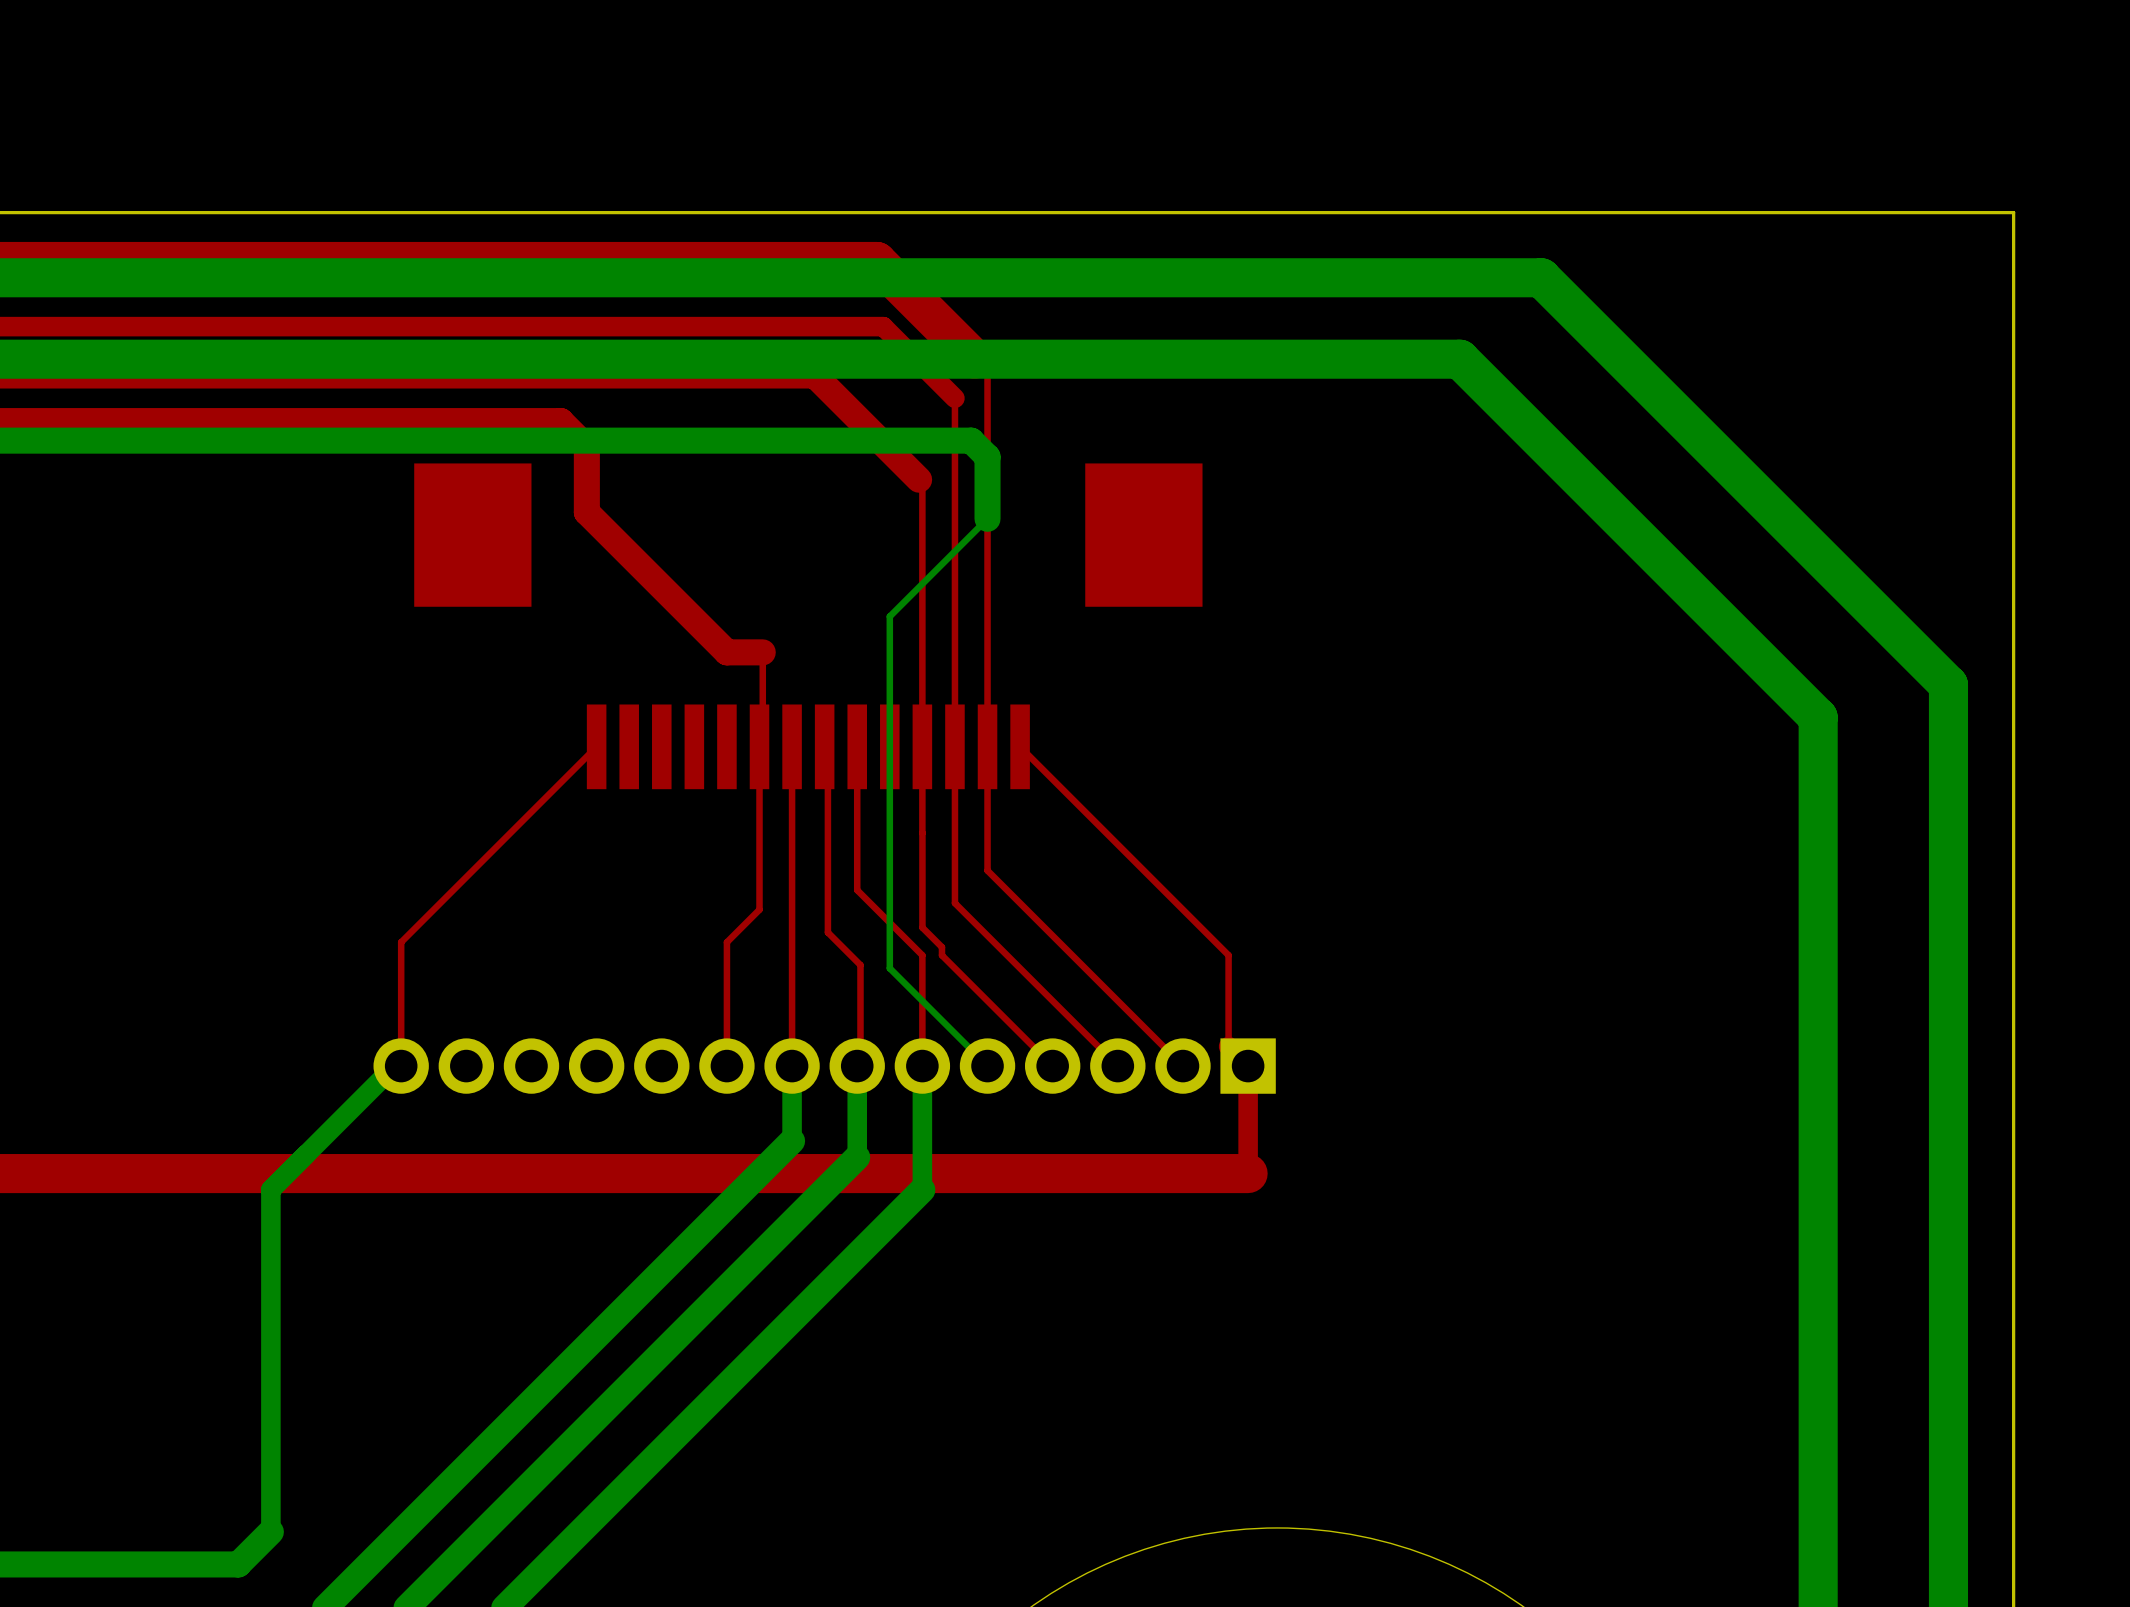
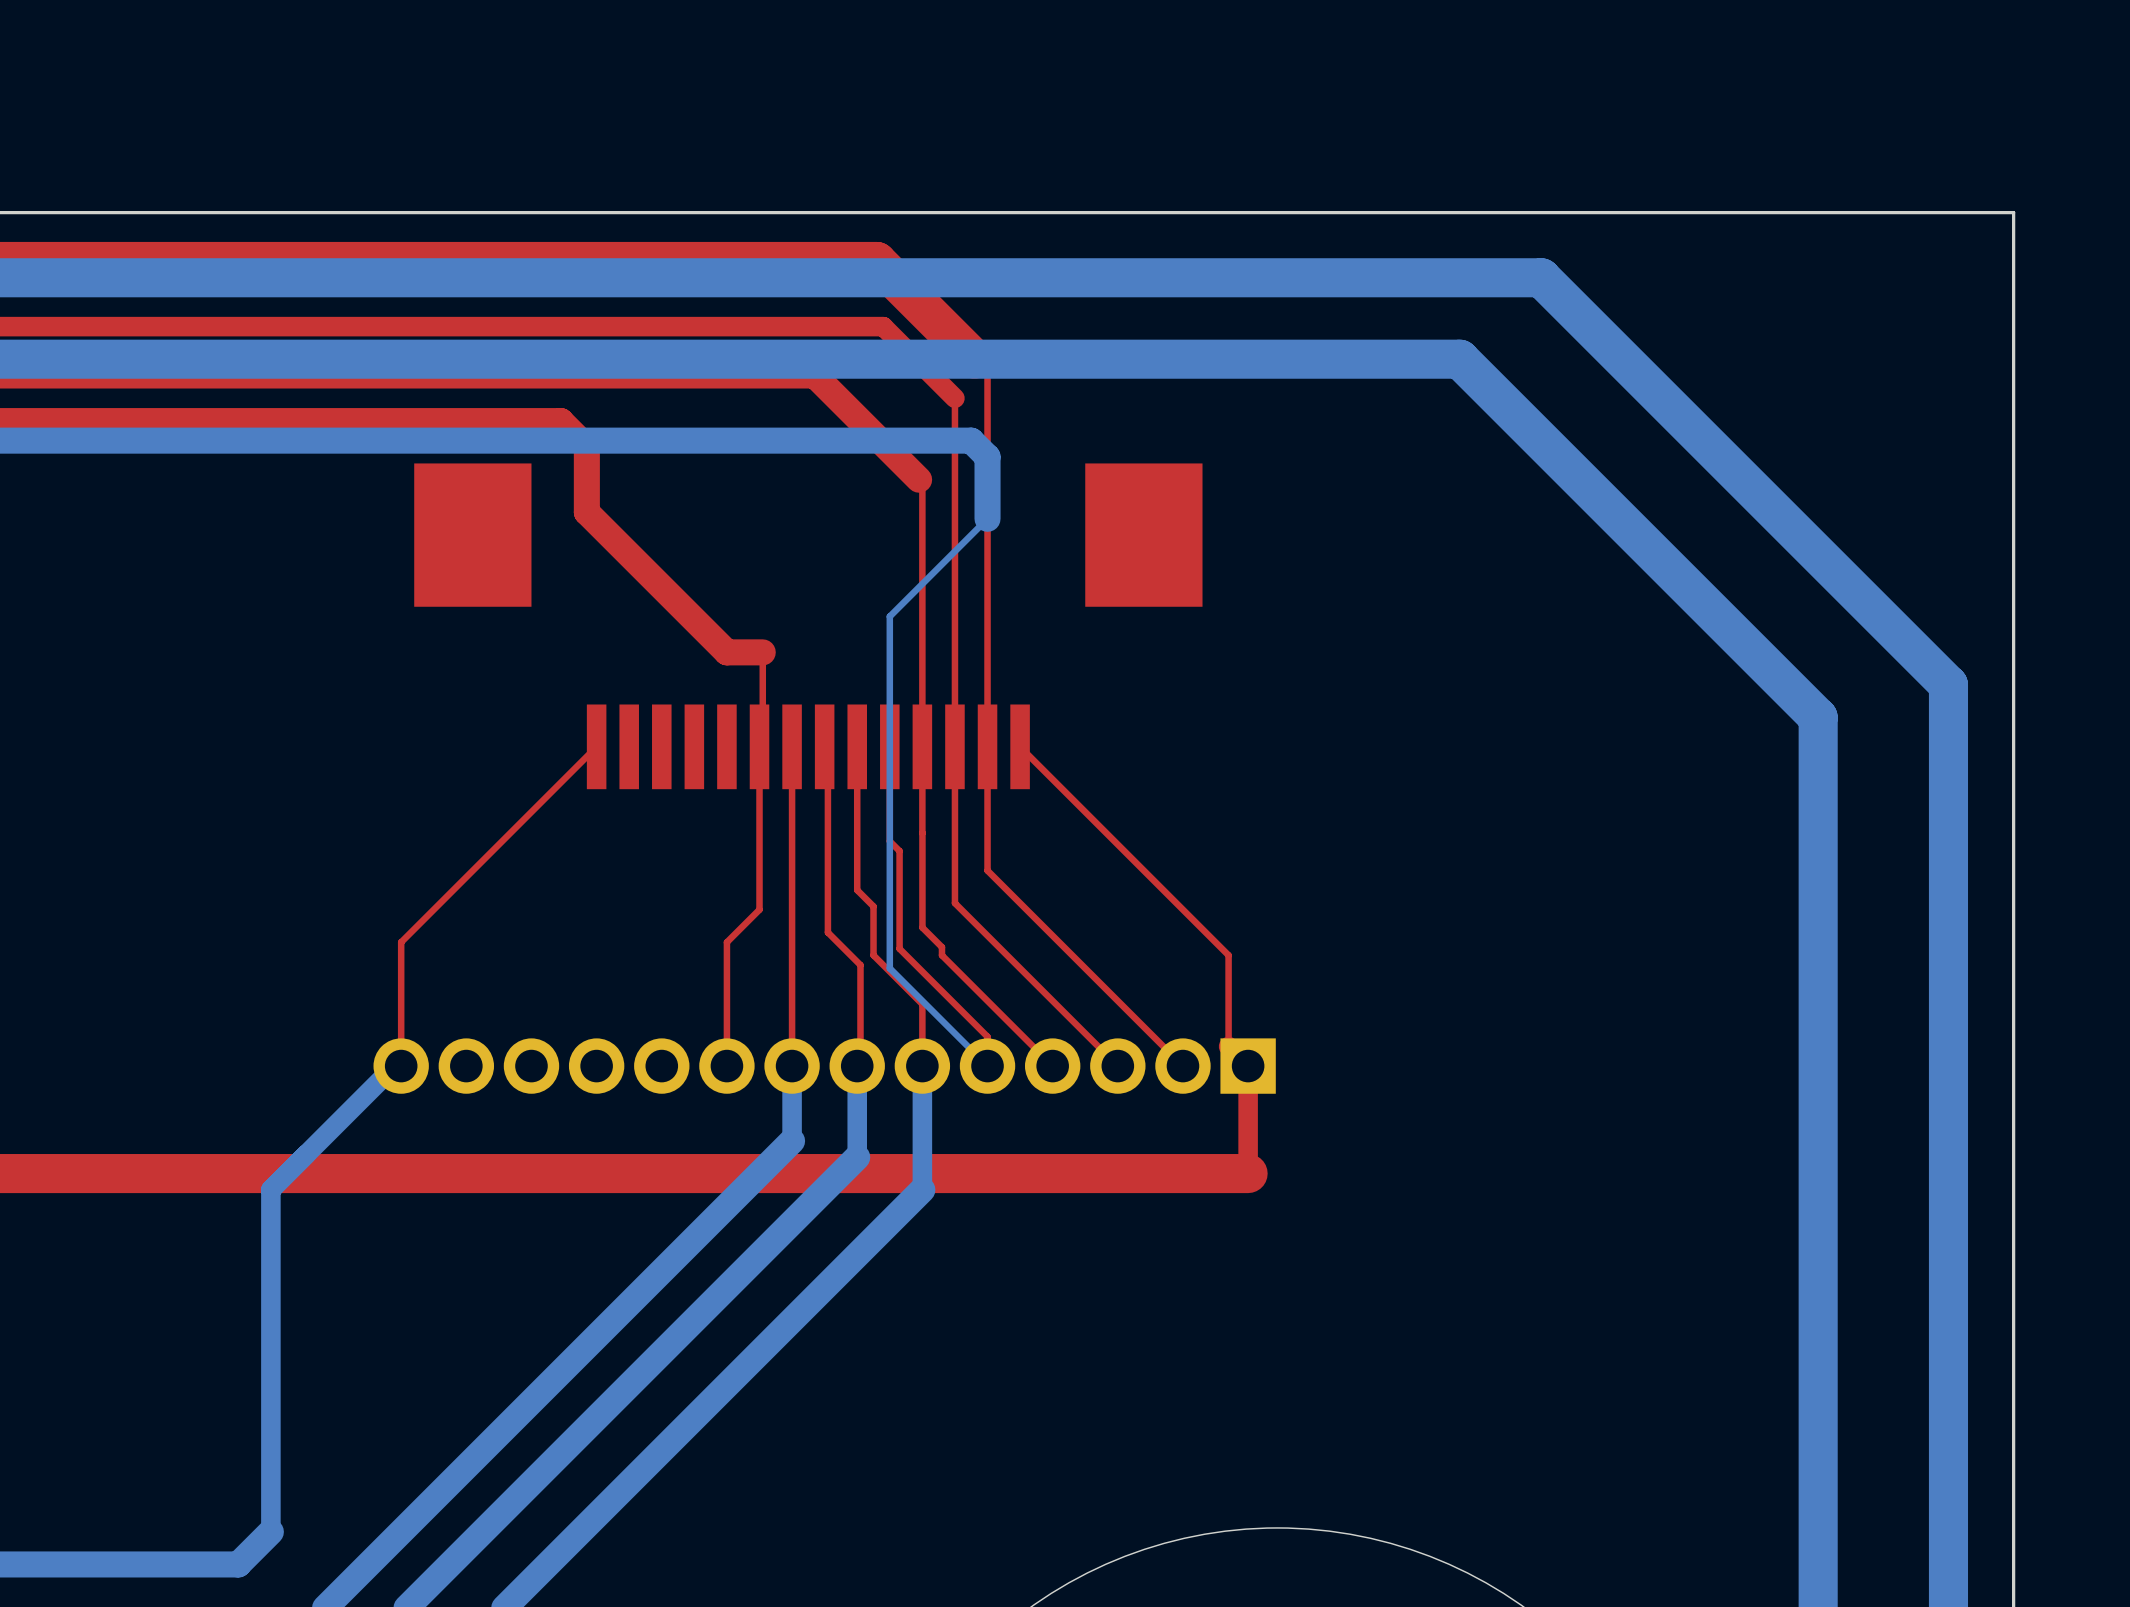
top track: none -> (889, 746) (889, 841) (899, 851) (899, 948) (987, 1036) (987, 1066)
top track: (873, 906) (922, 955) (922, 1004) -> (873, 906) (873, 955) (922, 1004)

